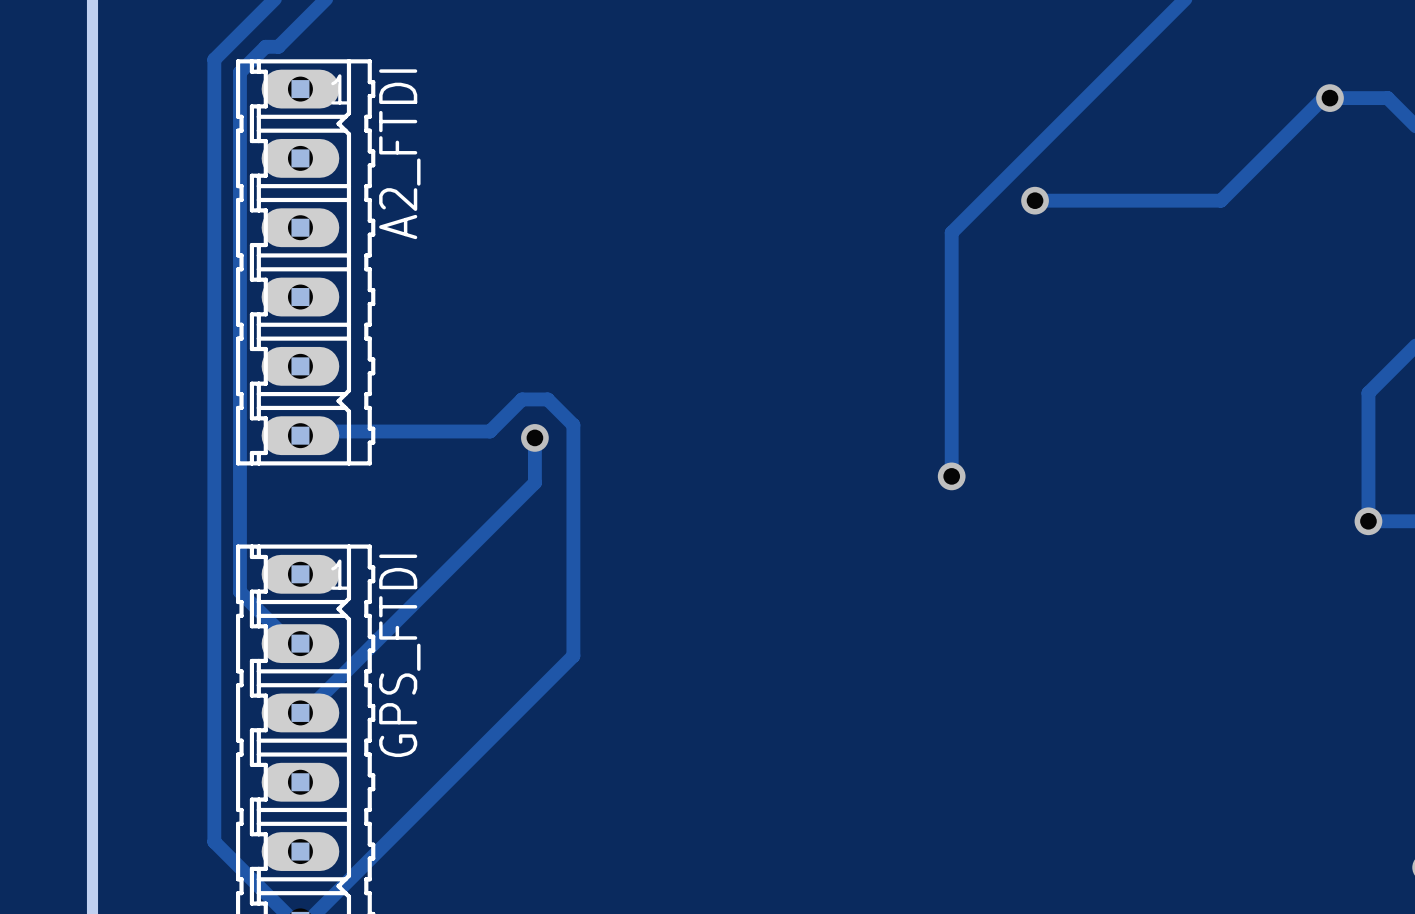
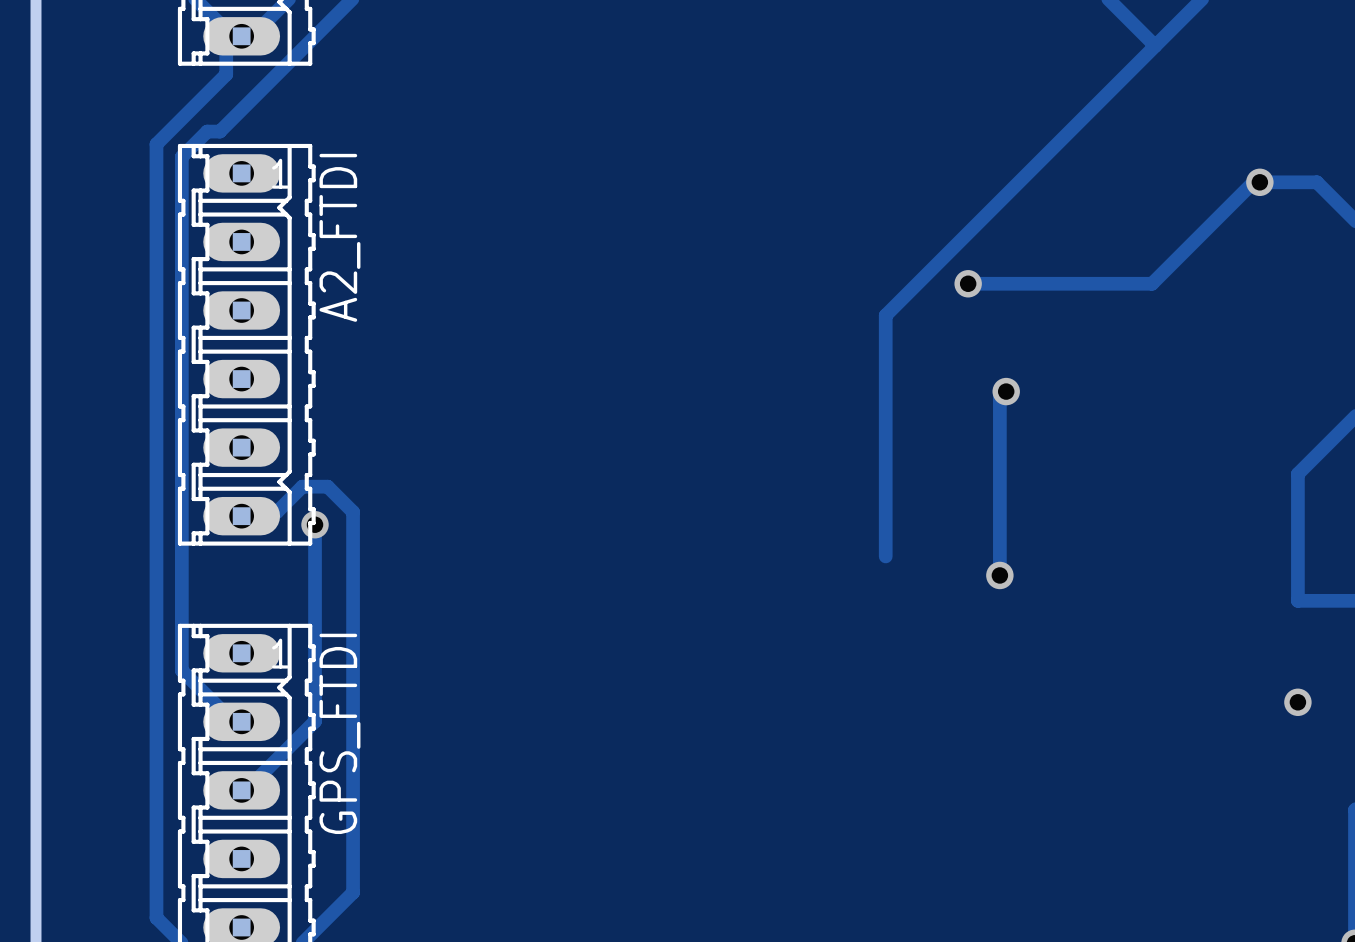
track: none -> (1006, 391) (999, 397) (999, 575)
via: none -> (1006, 391)
track: (336, 431) (490, 431) (522, 399) (547, 399) (573, 425) (573, 655) (413, 816) -> (276, 512) (302, 486) (327, 486) (353, 512) (353, 892)
track: (534, 437) (534, 482) (374, 643) -> (315, 524) (315, 721)
via position: (534, 437) -> (315, 524)
via: (951, 476) -> none
via: none -> (999, 575)
via position: (1368, 521) -> (1297, 702)

